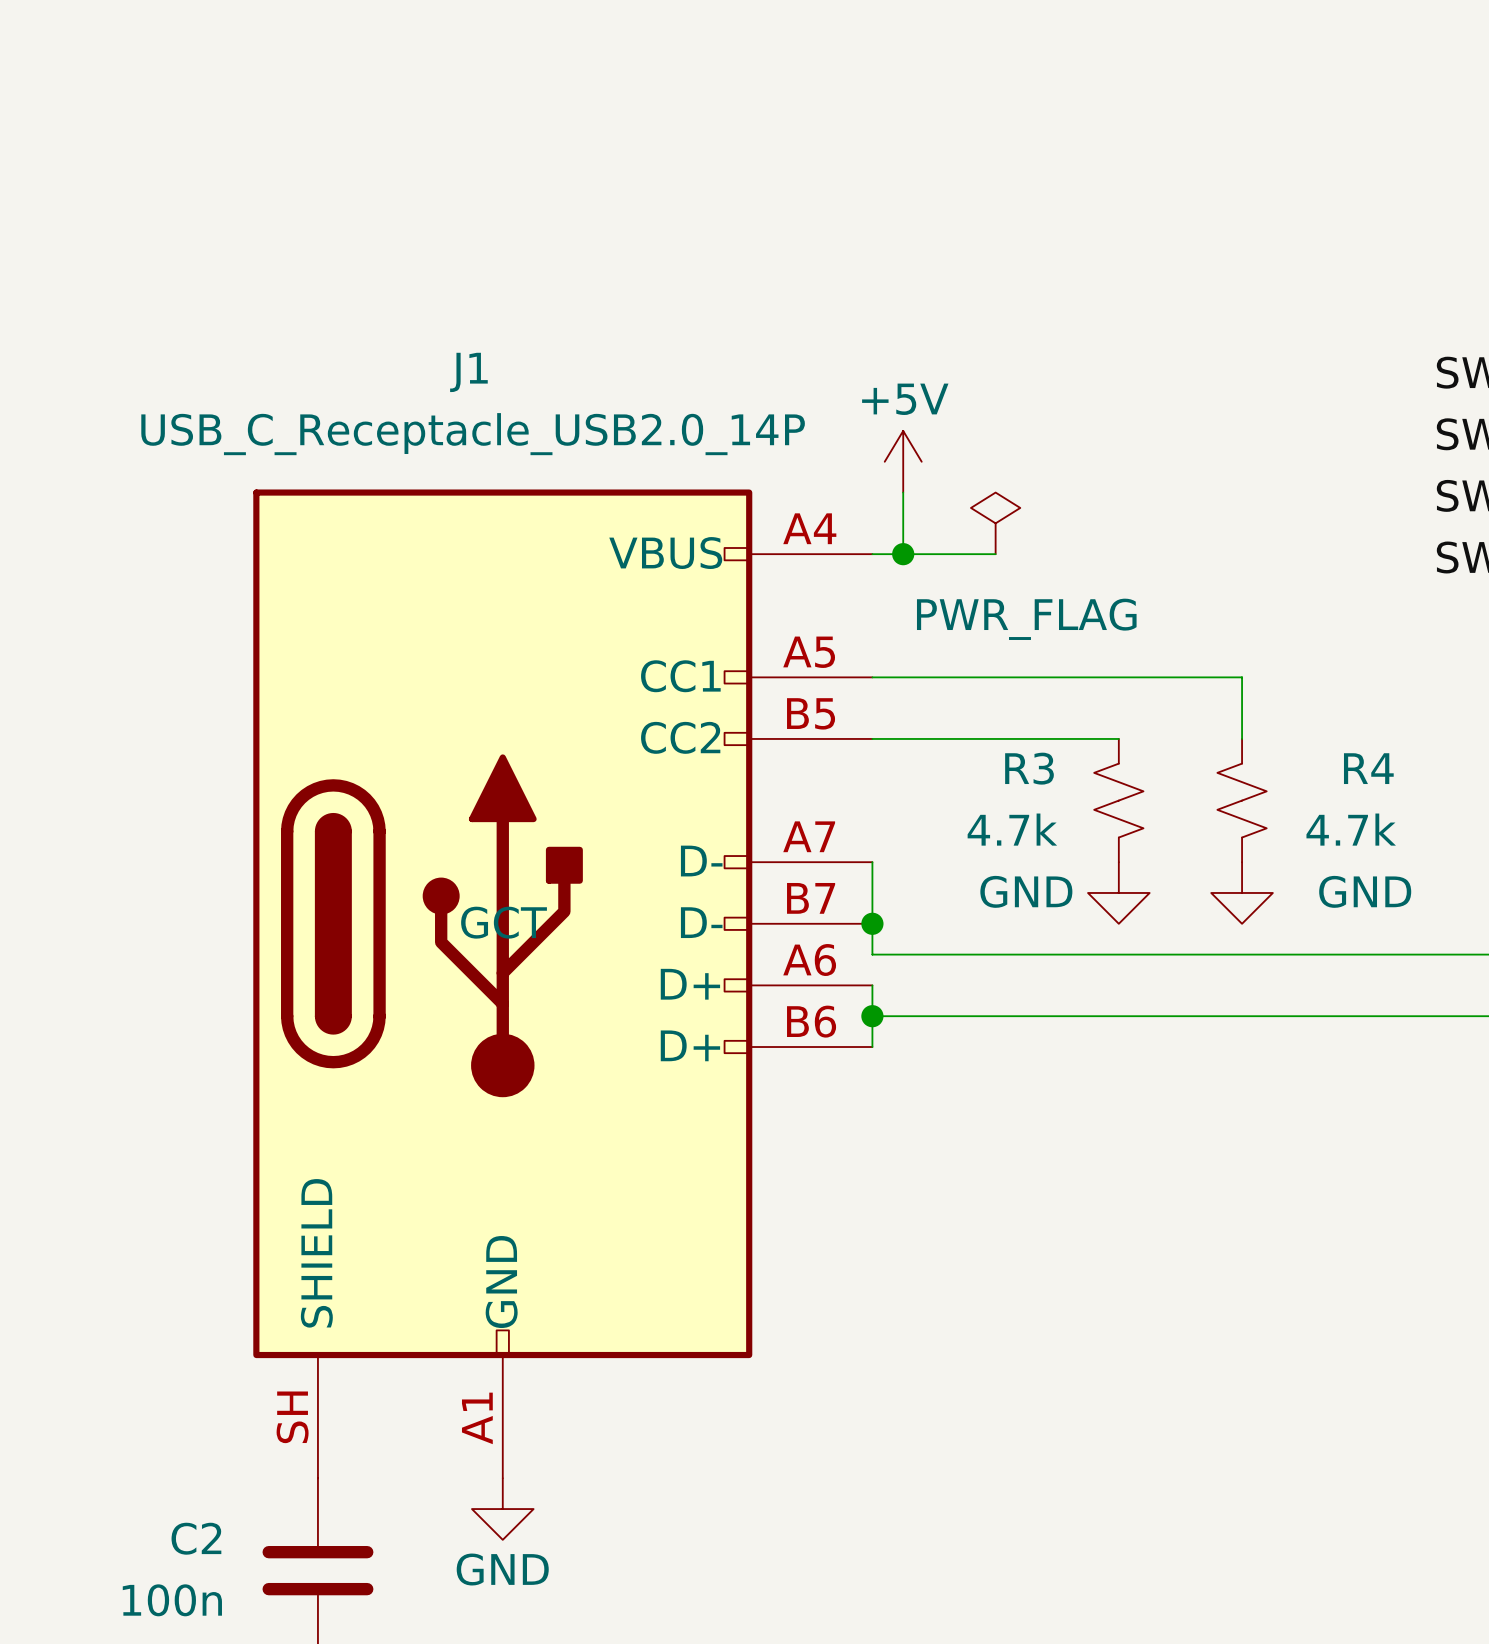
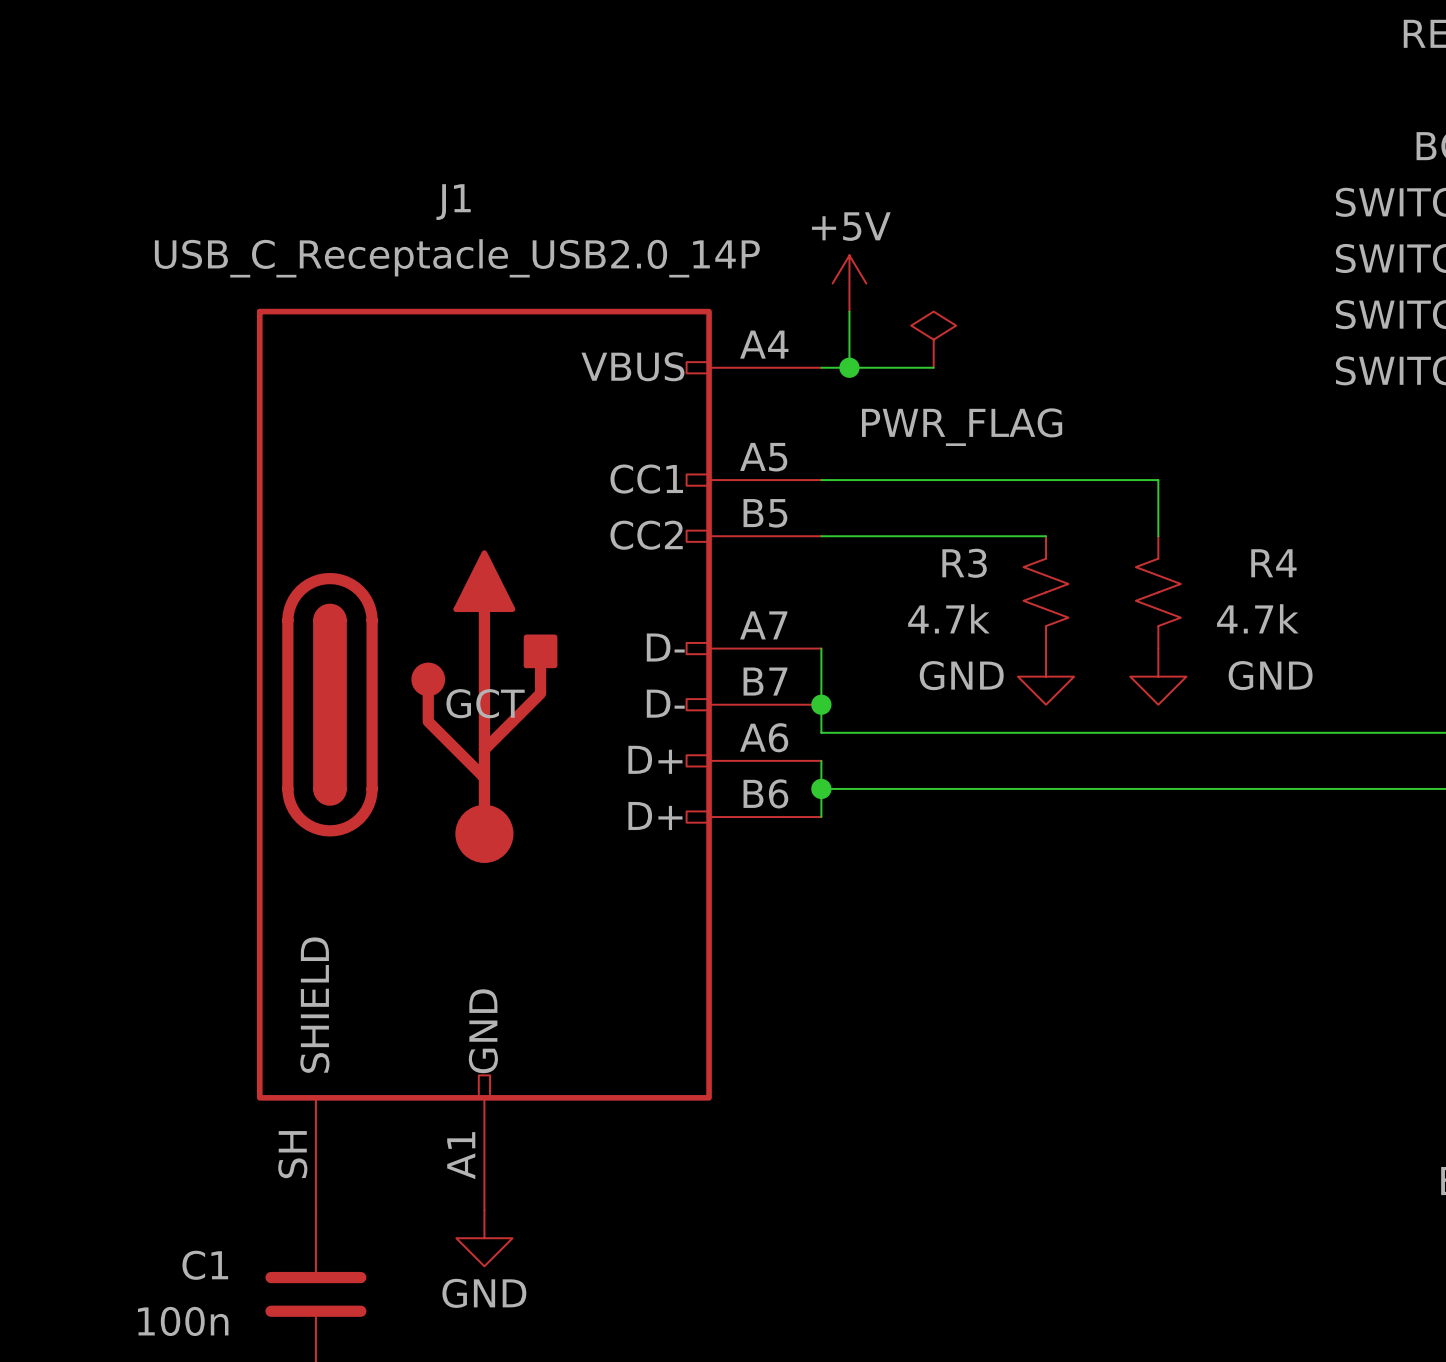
C2 name: C2 (196, 1538) -> C1 (205, 1265)

